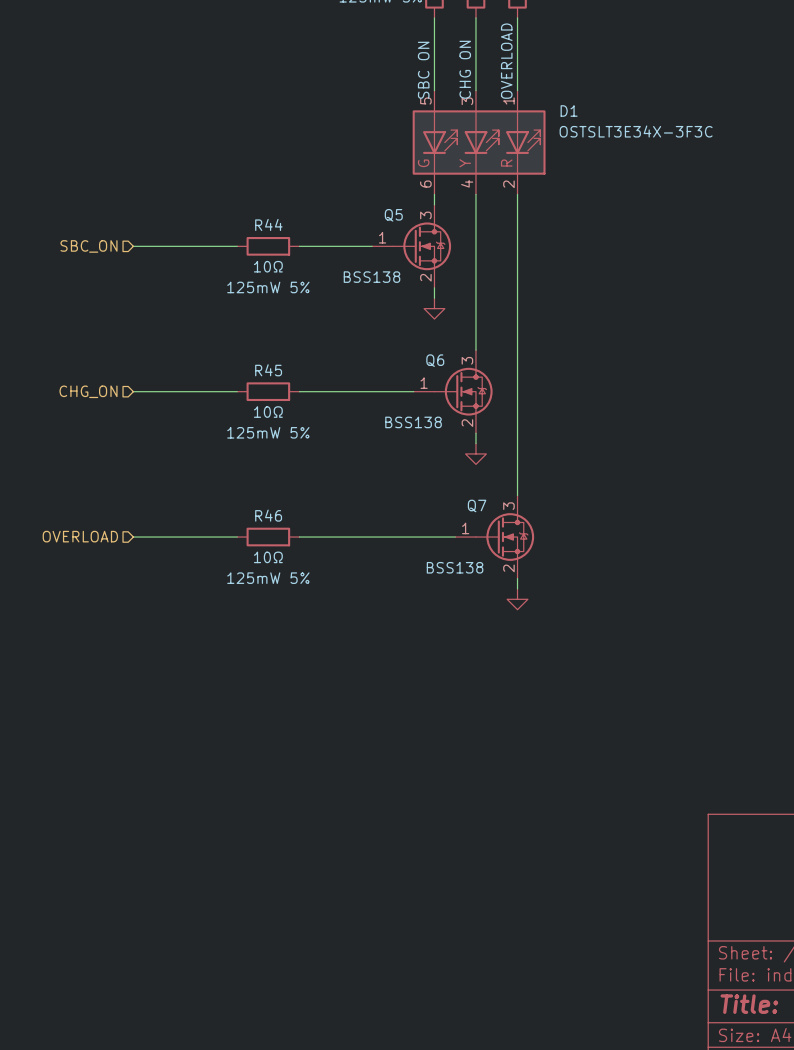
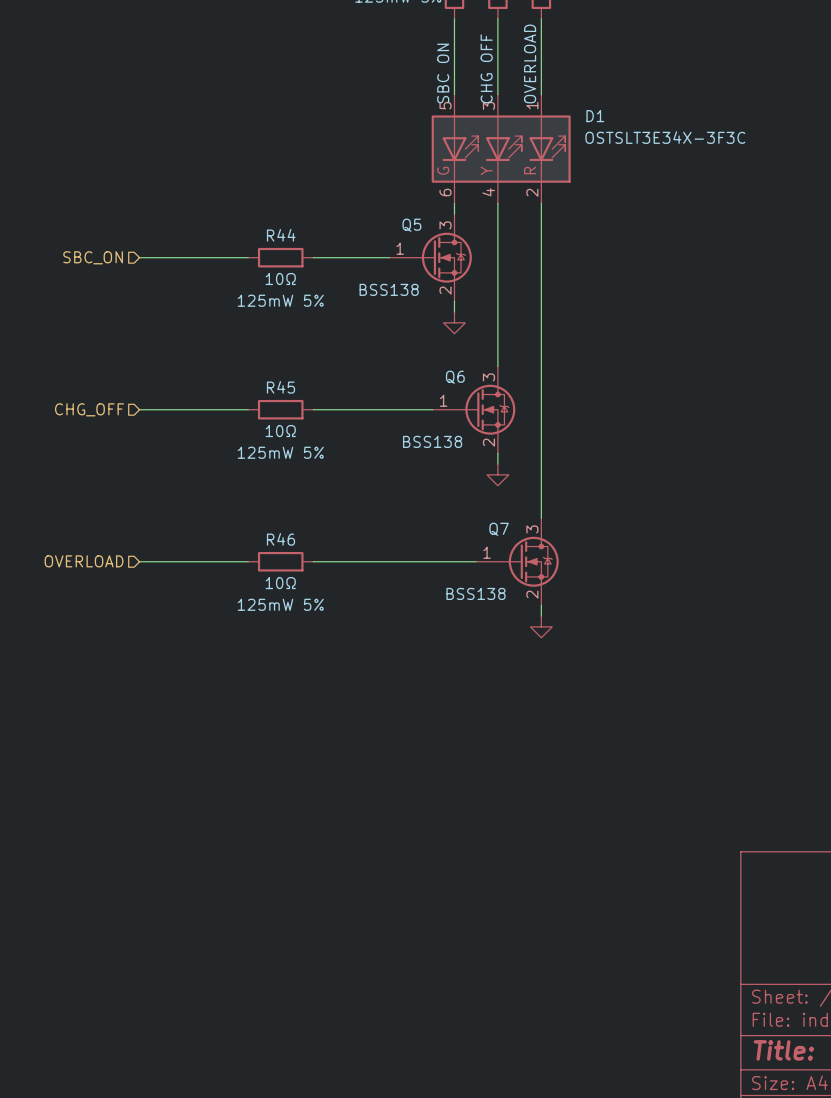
D1 text: CHG ON (465, 69) -> CHG OFF (486, 68)
hierarchical label: CHG_ON (88, 391) -> CHG_OFF (89, 409)

